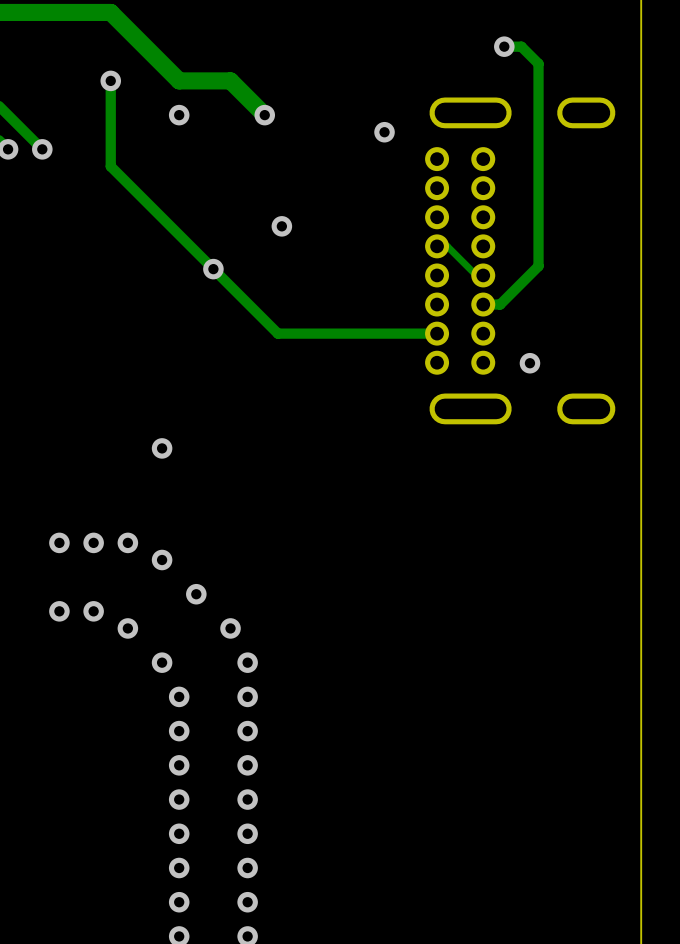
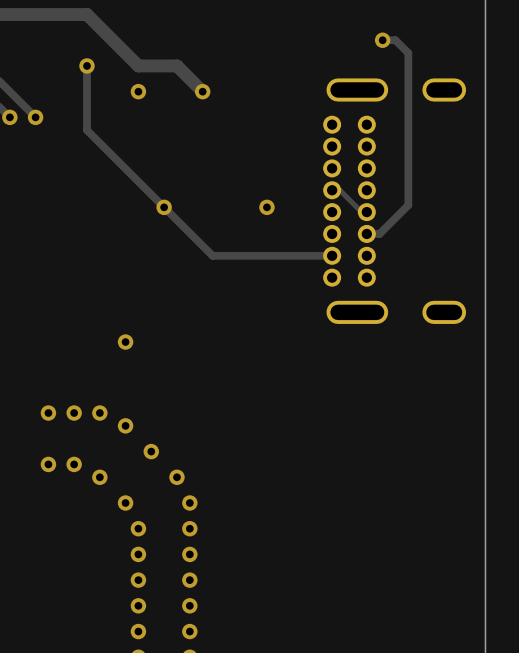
via: (384, 132) -> none
via: (281, 226) -> none
via: none -> (266, 207)
via: (529, 363) -> none

